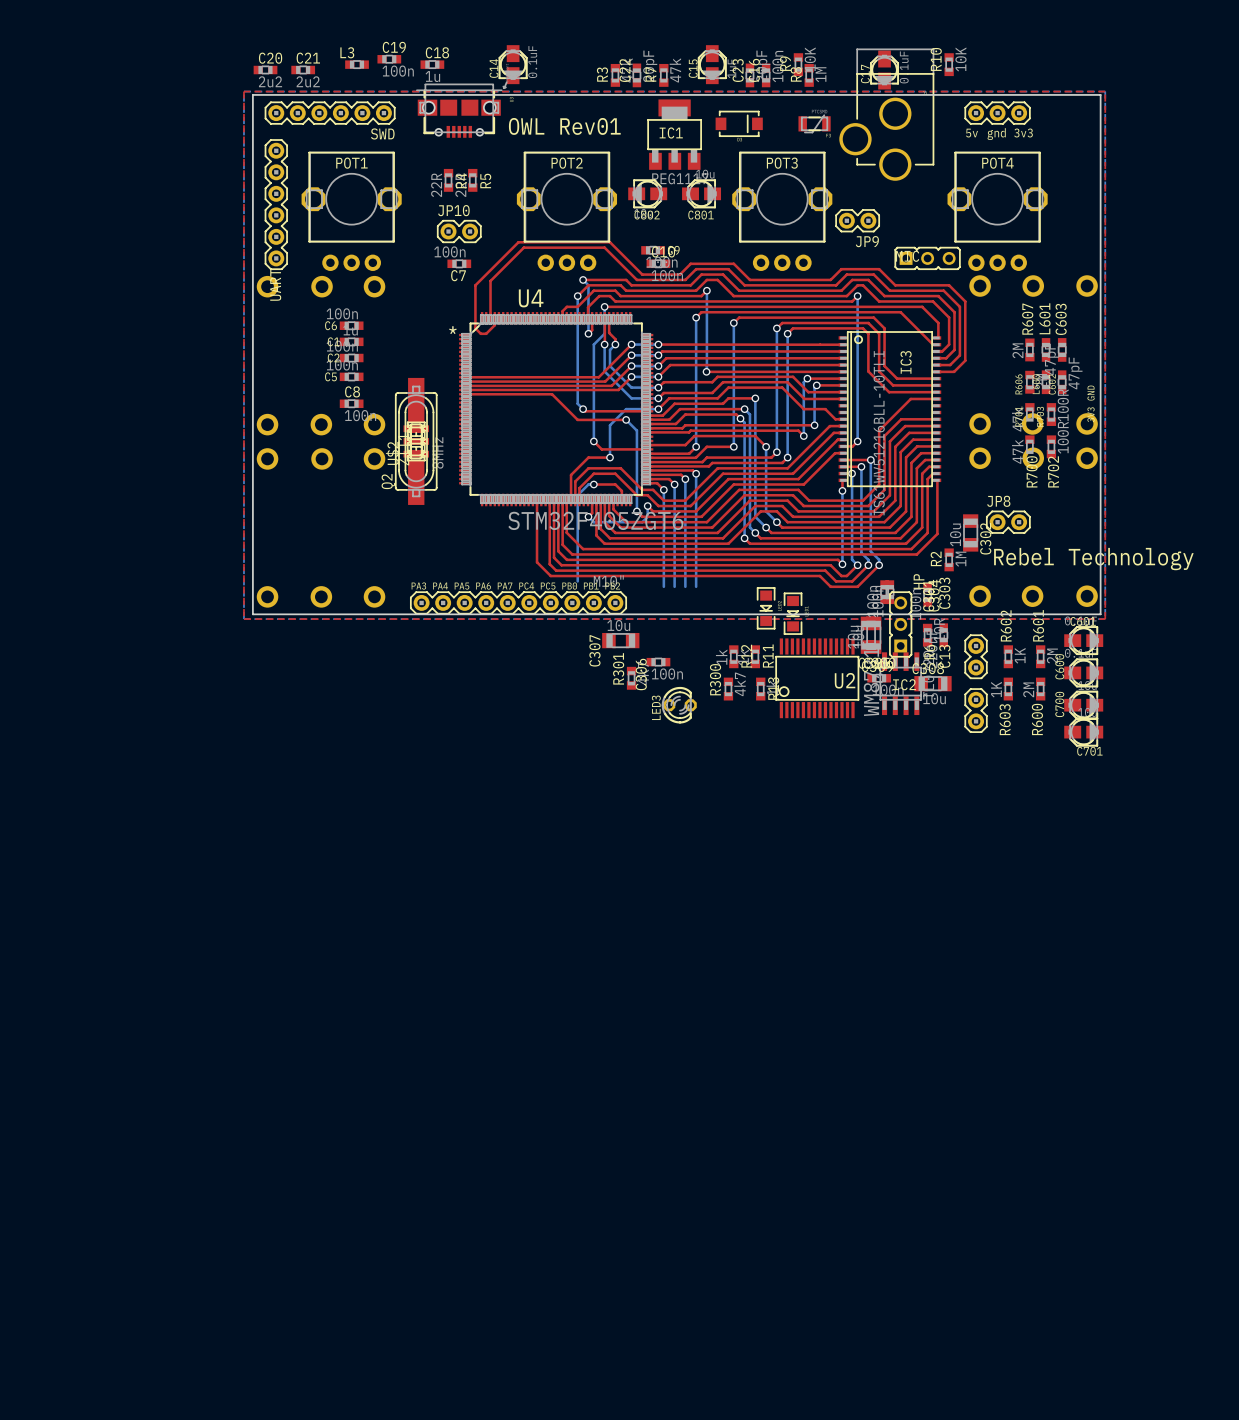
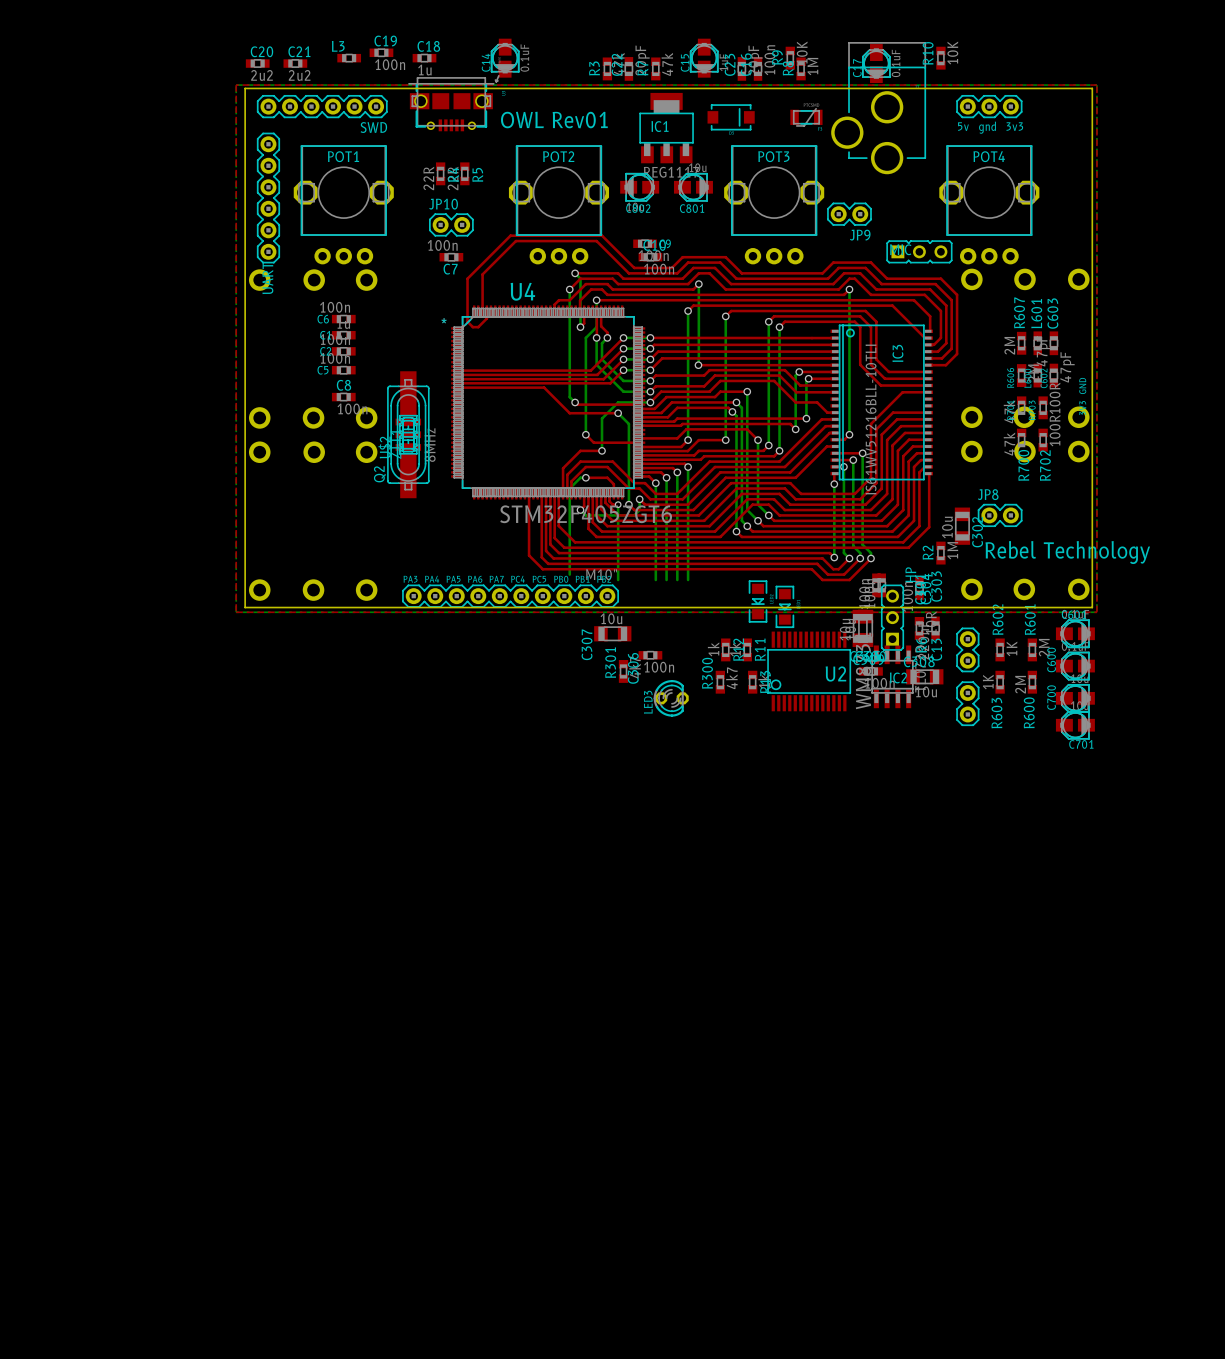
top track: none -> (609, 493) (609, 501) (612, 504) (618, 504)
bottom track: none -> (618, 504) (618, 579)
via: none -> (618, 504)

